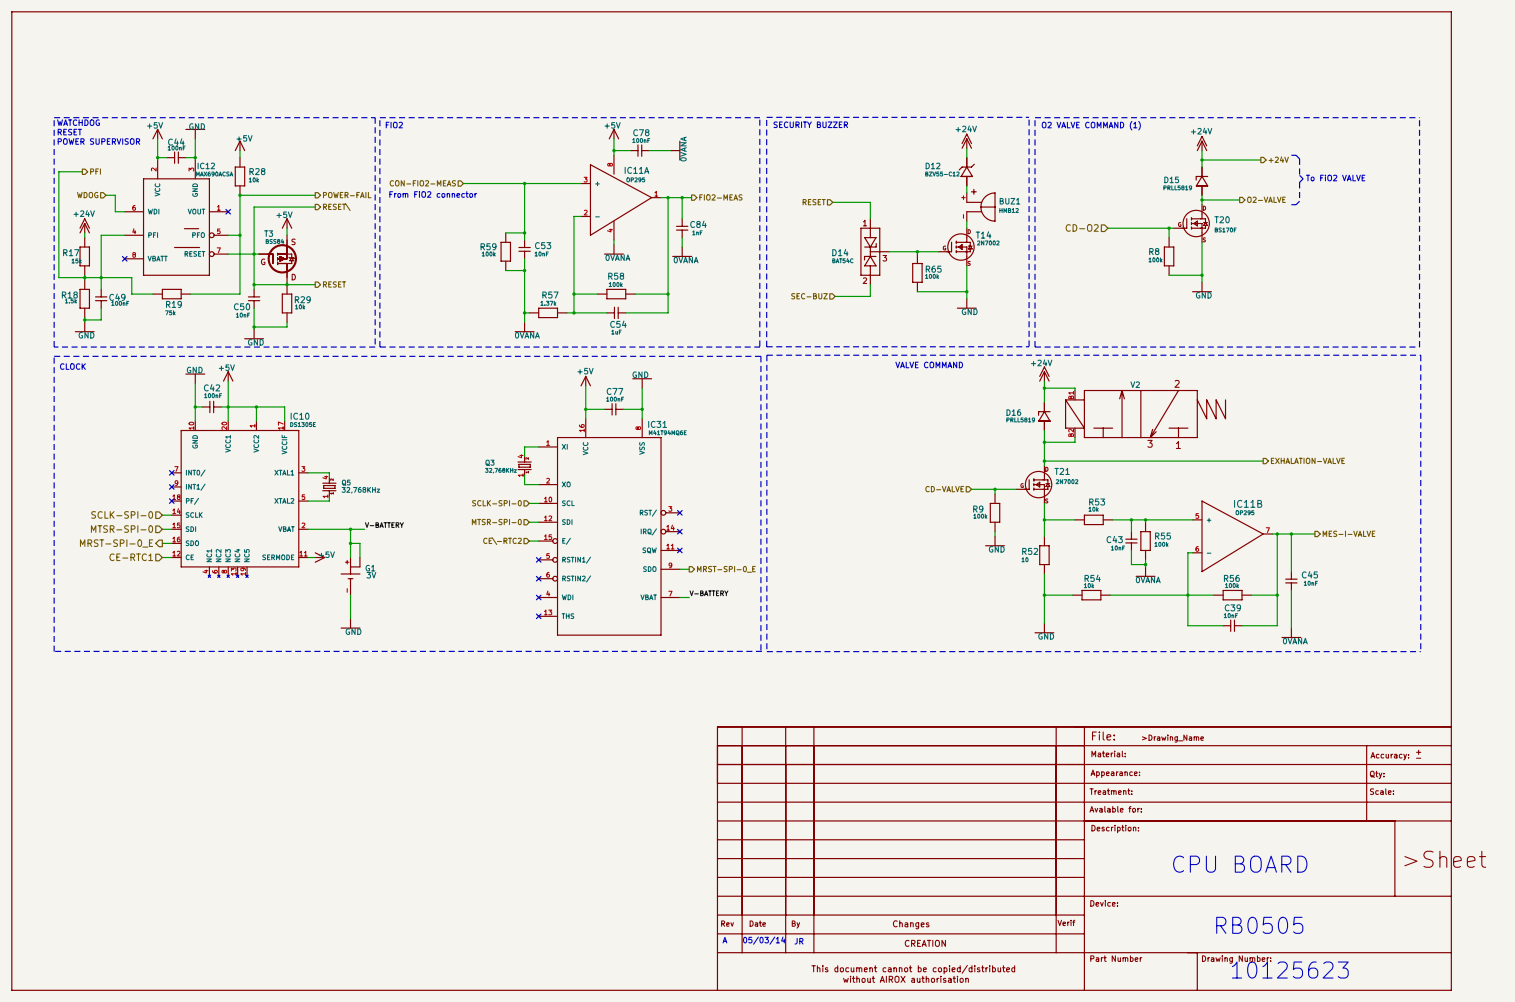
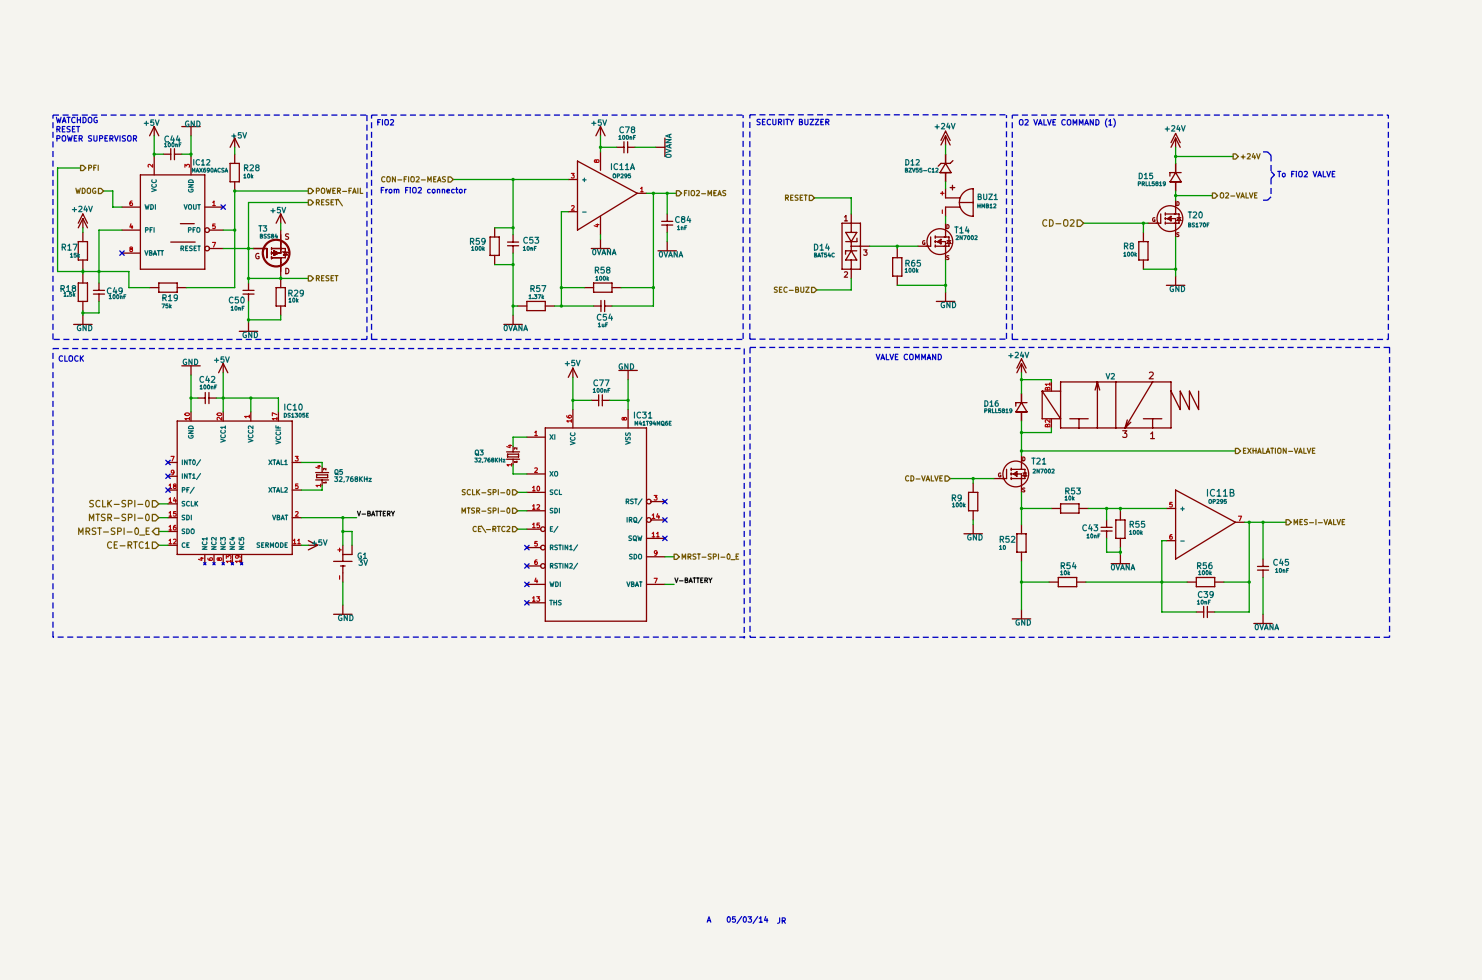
part: (731, 501) -> none
text: CPU BOARD (1240, 864) -> none
text: RB0505 (1259, 925) -> none
text: 10125623 (1290, 970) -> none

